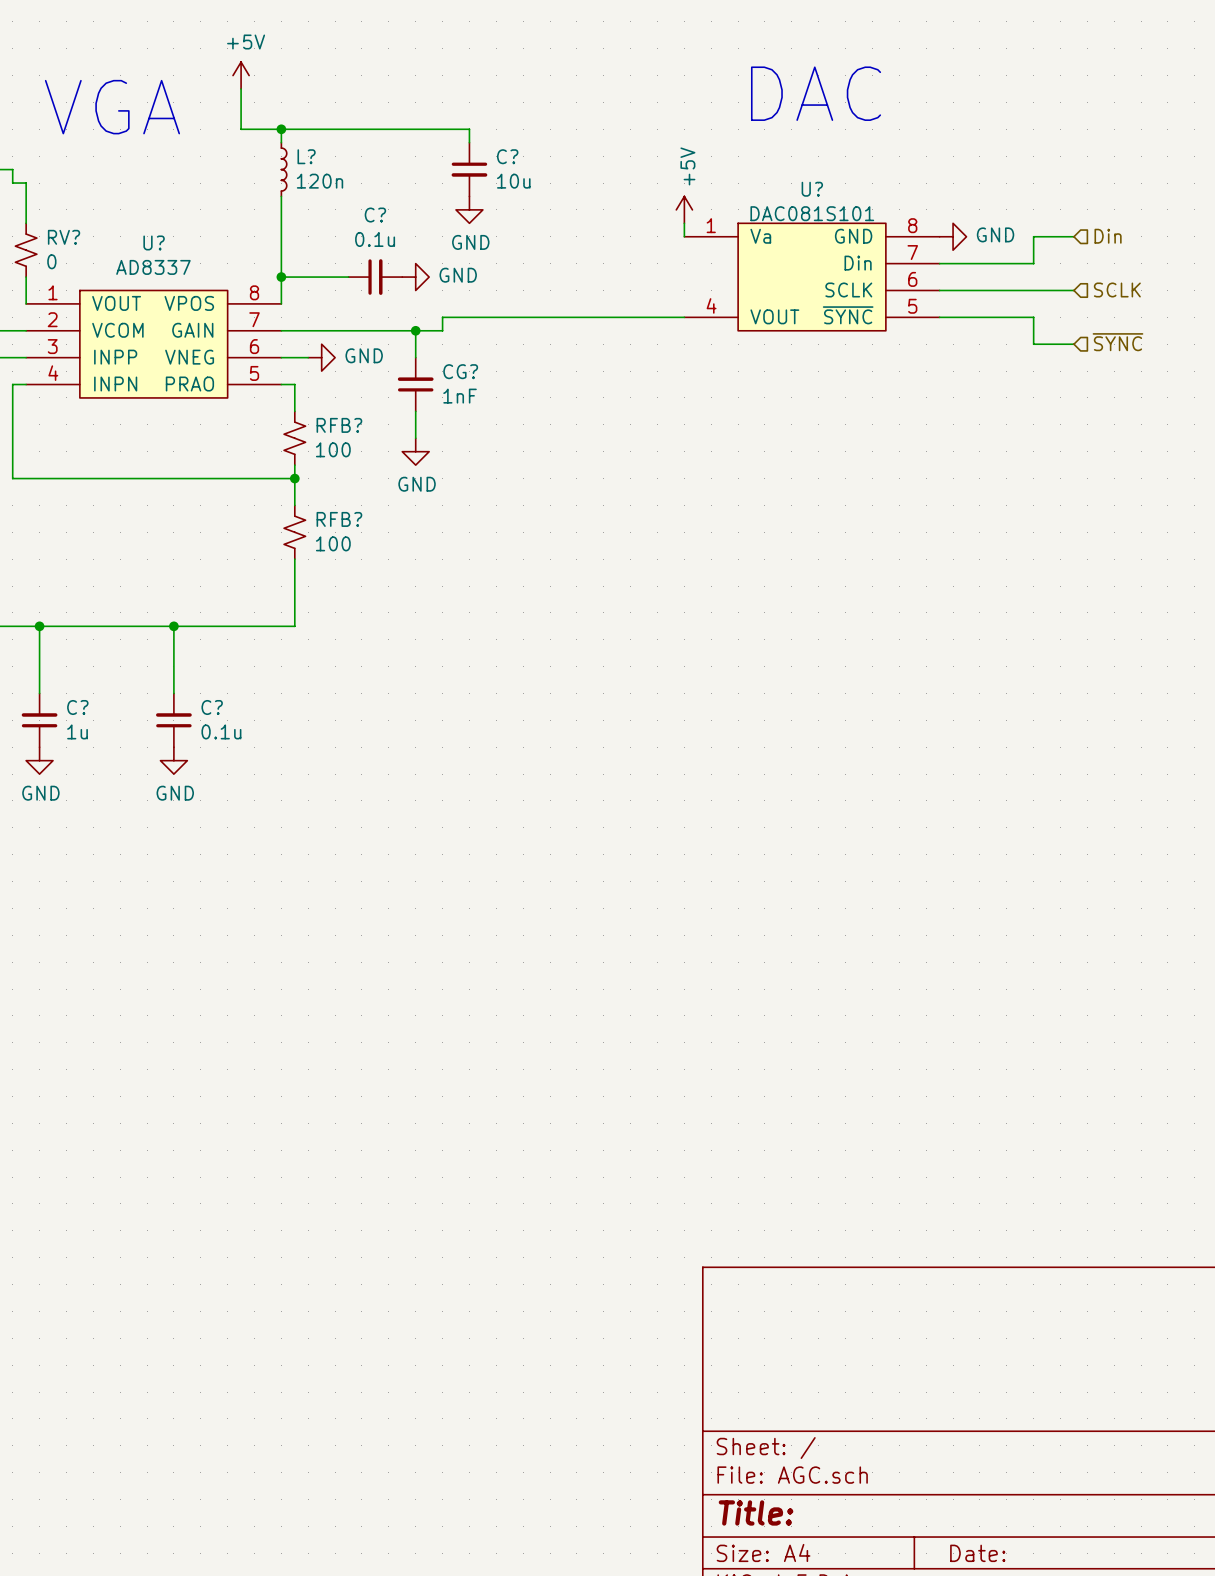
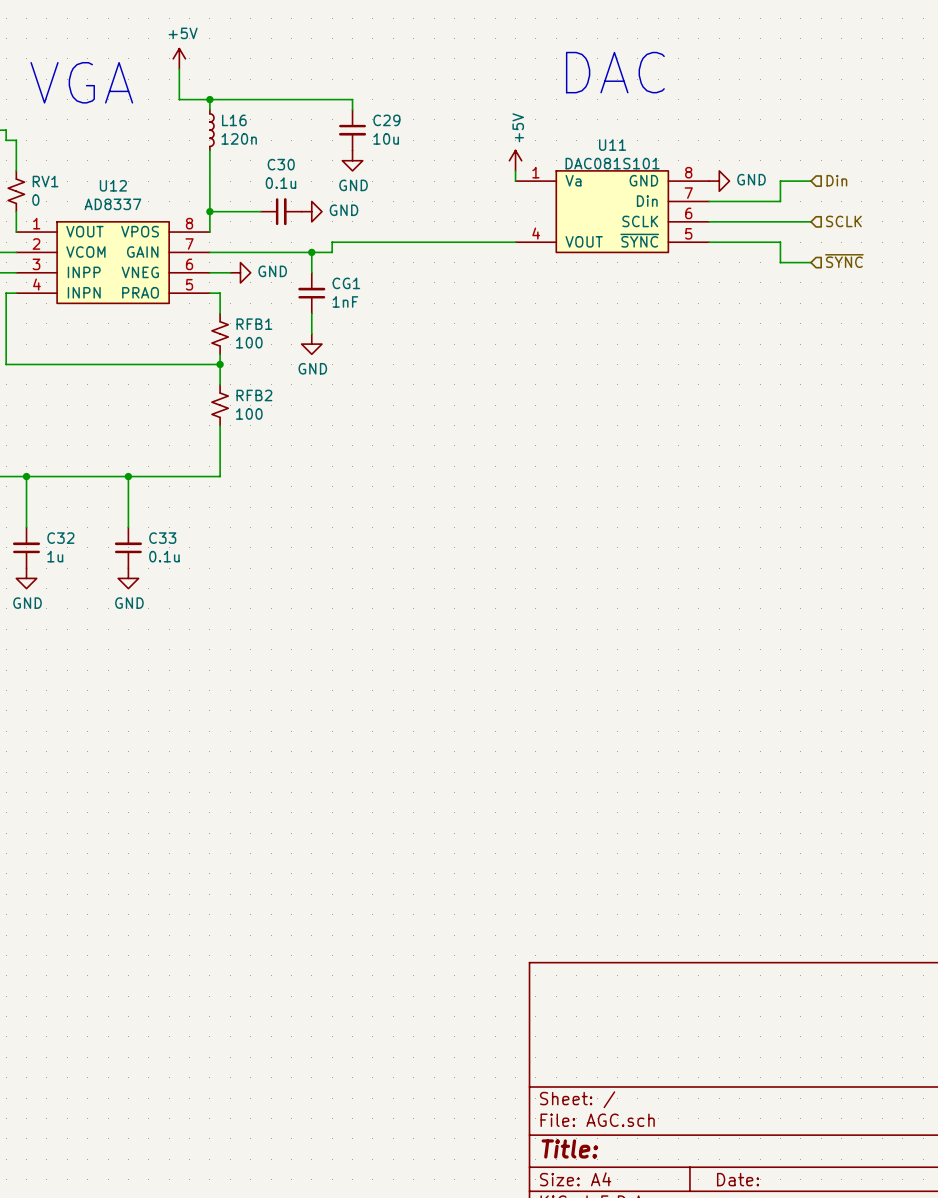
L? name: L? (306, 156) -> L16 (234, 120)
C? name: C? (507, 156) -> C29 (386, 120)
U? name: U? (812, 189) -> U11 (612, 145)
C? name: C? (375, 215) -> C30 (281, 164)
RV? name: RV? (64, 237) -> RV1 (45, 181)
U? name: U? (154, 242) -> U12 (113, 185)
CG? name: CG? (460, 371) -> CG1 (346, 283)
RFB? name: RFB? (339, 425) -> RFB1 (254, 324)
RFB? name: RFB? (339, 519) -> RFB2 (254, 395)
C? name: C? (77, 707) -> C32 (60, 538)
C? name: C? (212, 707) -> C33 (162, 538)

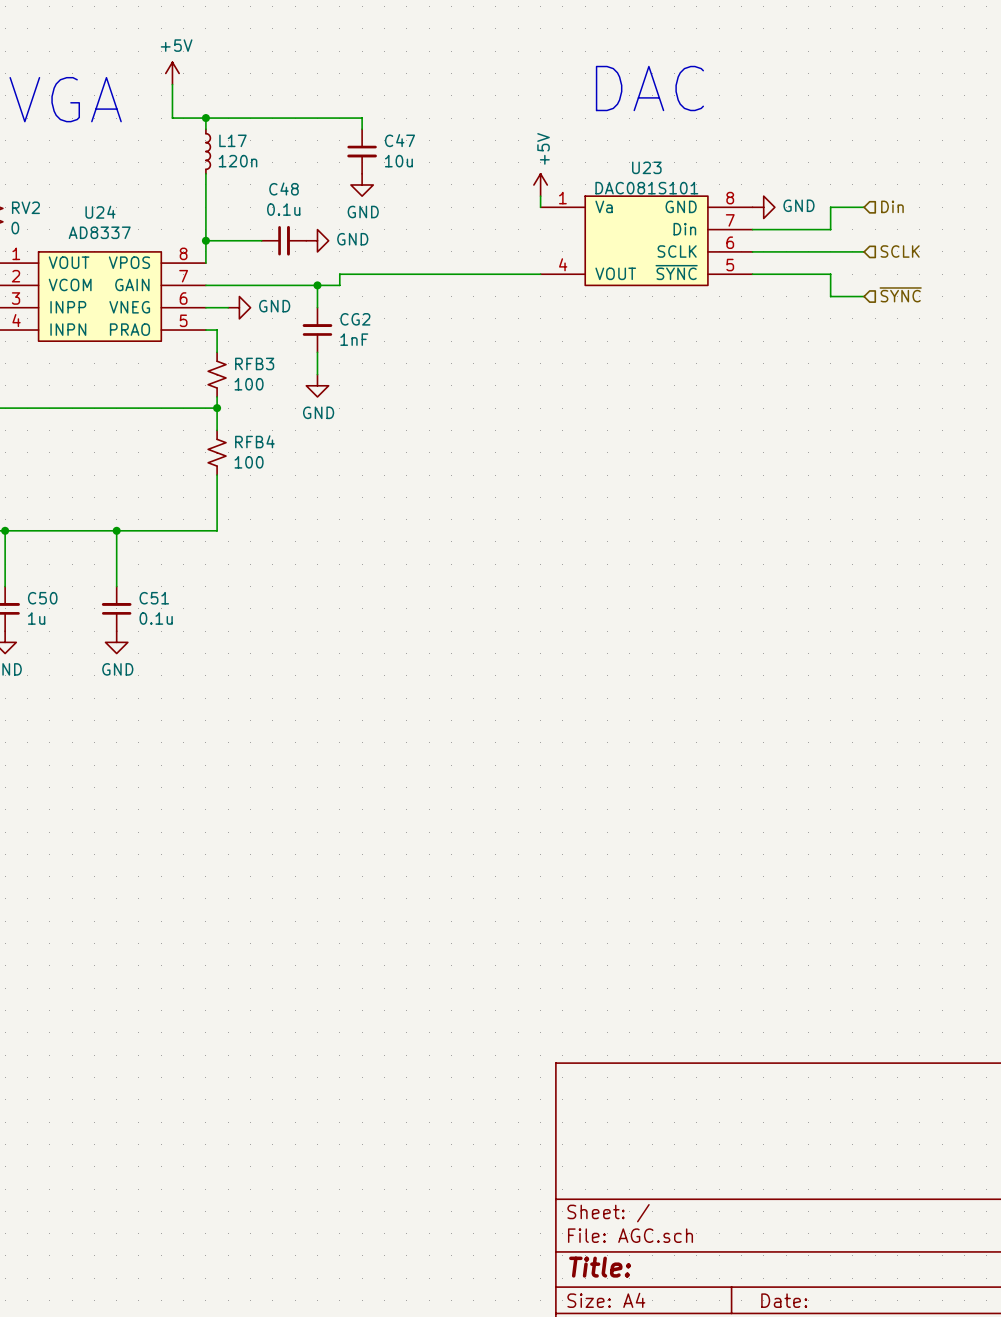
L16 name: L16 (234, 120) -> L17 (232, 140)
C29 name: C29 (386, 120) -> C47 (399, 140)
U11 name: U11 (612, 145) -> U23 (646, 167)
C30 name: C30 (281, 164) -> C48 (284, 188)
RV1 name: RV1 (45, 181) -> RV2 (25, 207)
U12 name: U12 (113, 185) -> U24 (100, 212)
CG1 name: CG1 (346, 283) -> CG2 (355, 319)
RFB1 name: RFB1 (254, 324) -> RFB3 (254, 363)
RFB2 name: RFB2 (254, 395) -> RFB4 (254, 441)
C32 name: C32 (60, 538) -> C50 (42, 598)
C33 name: C33 (162, 538) -> C51 (154, 598)

